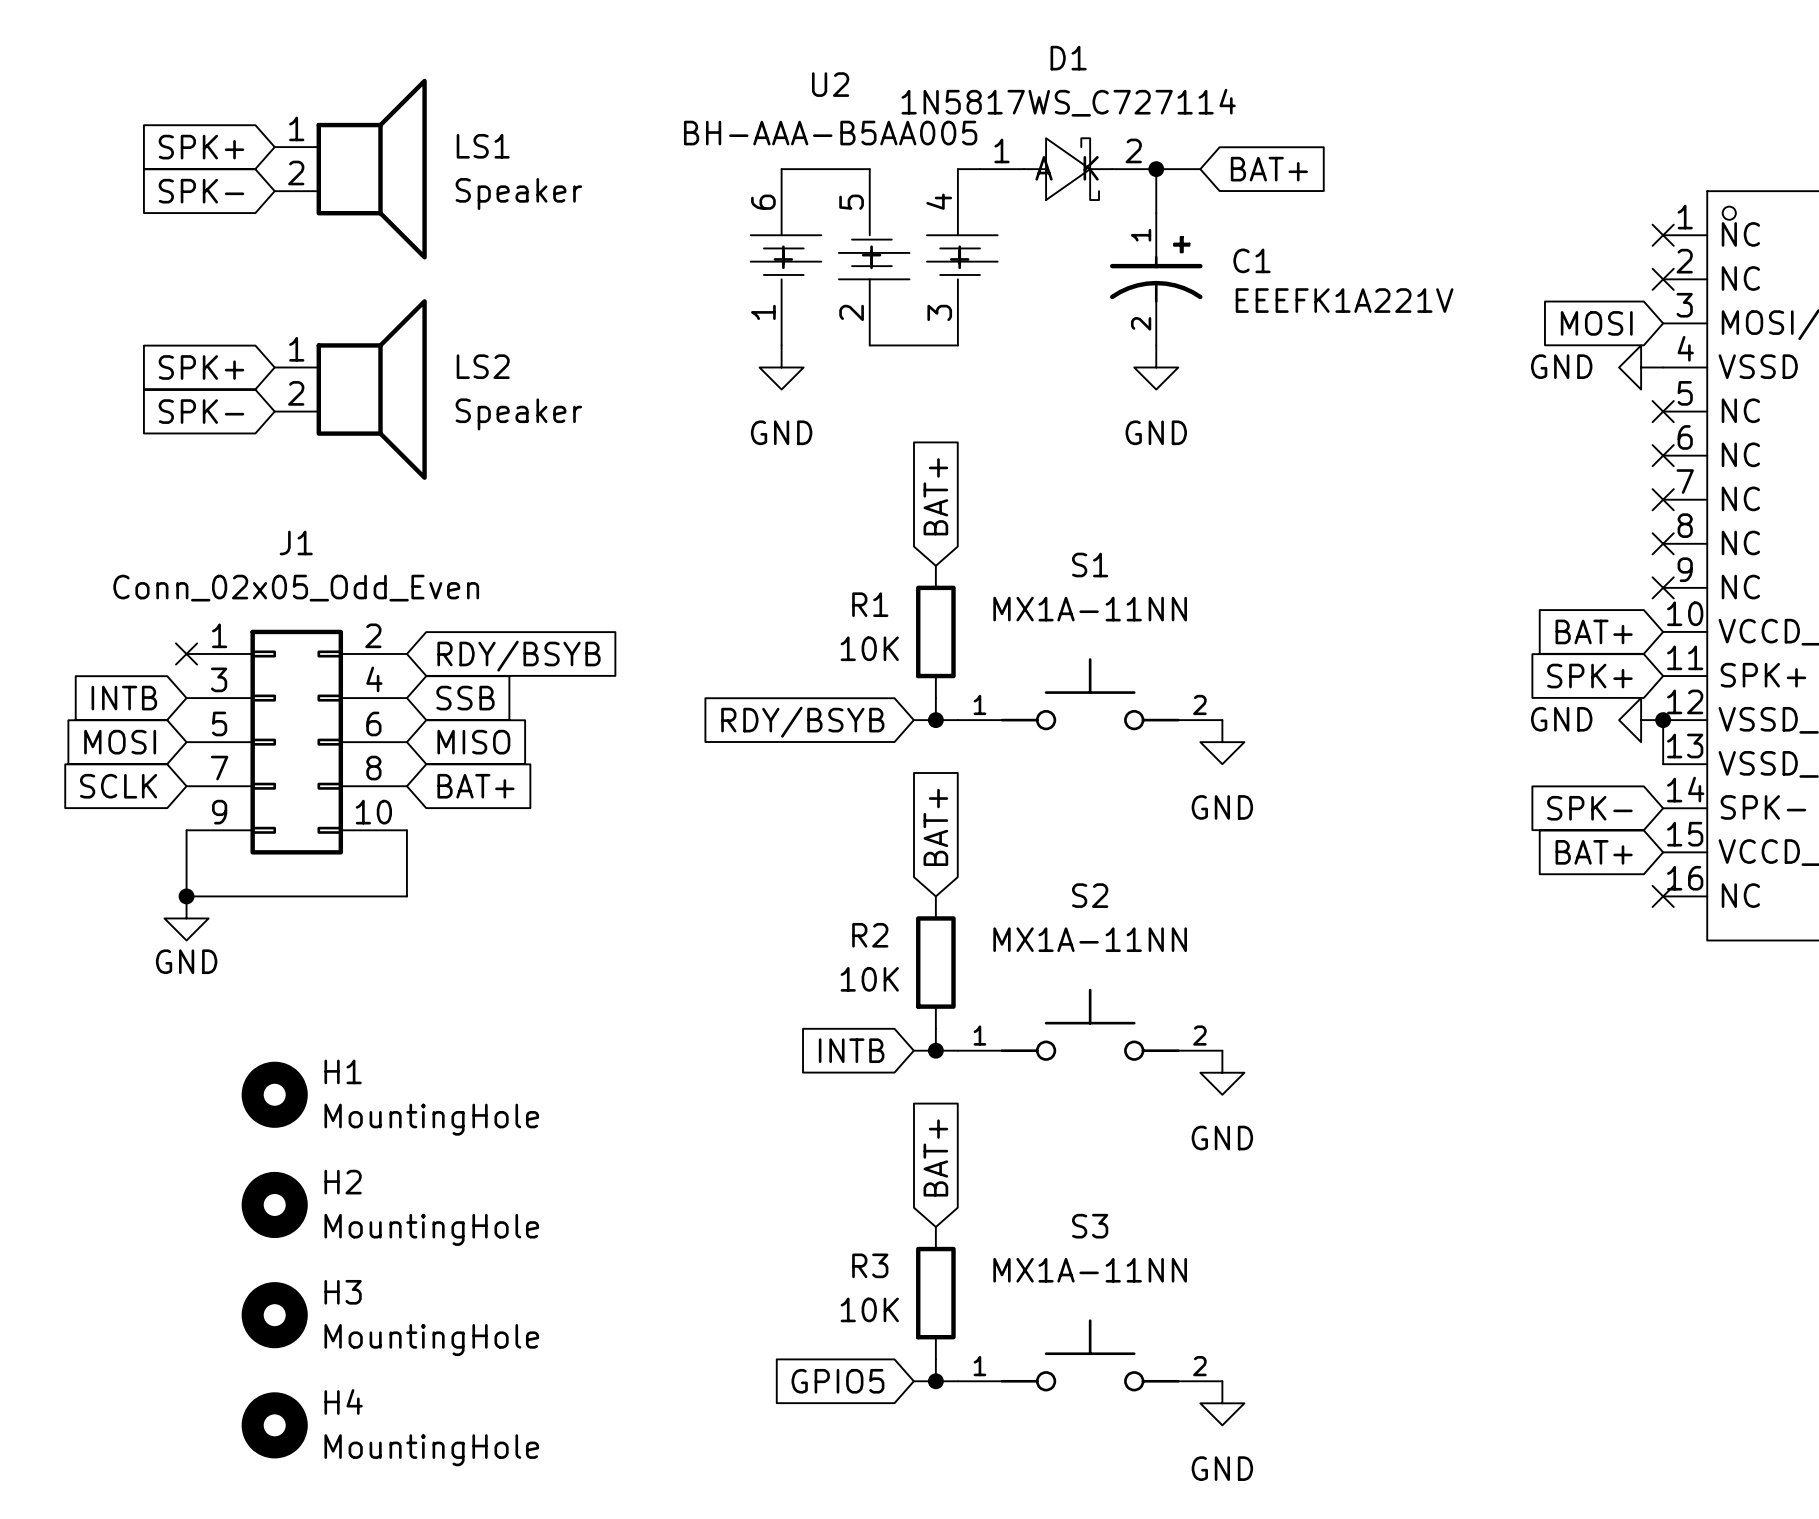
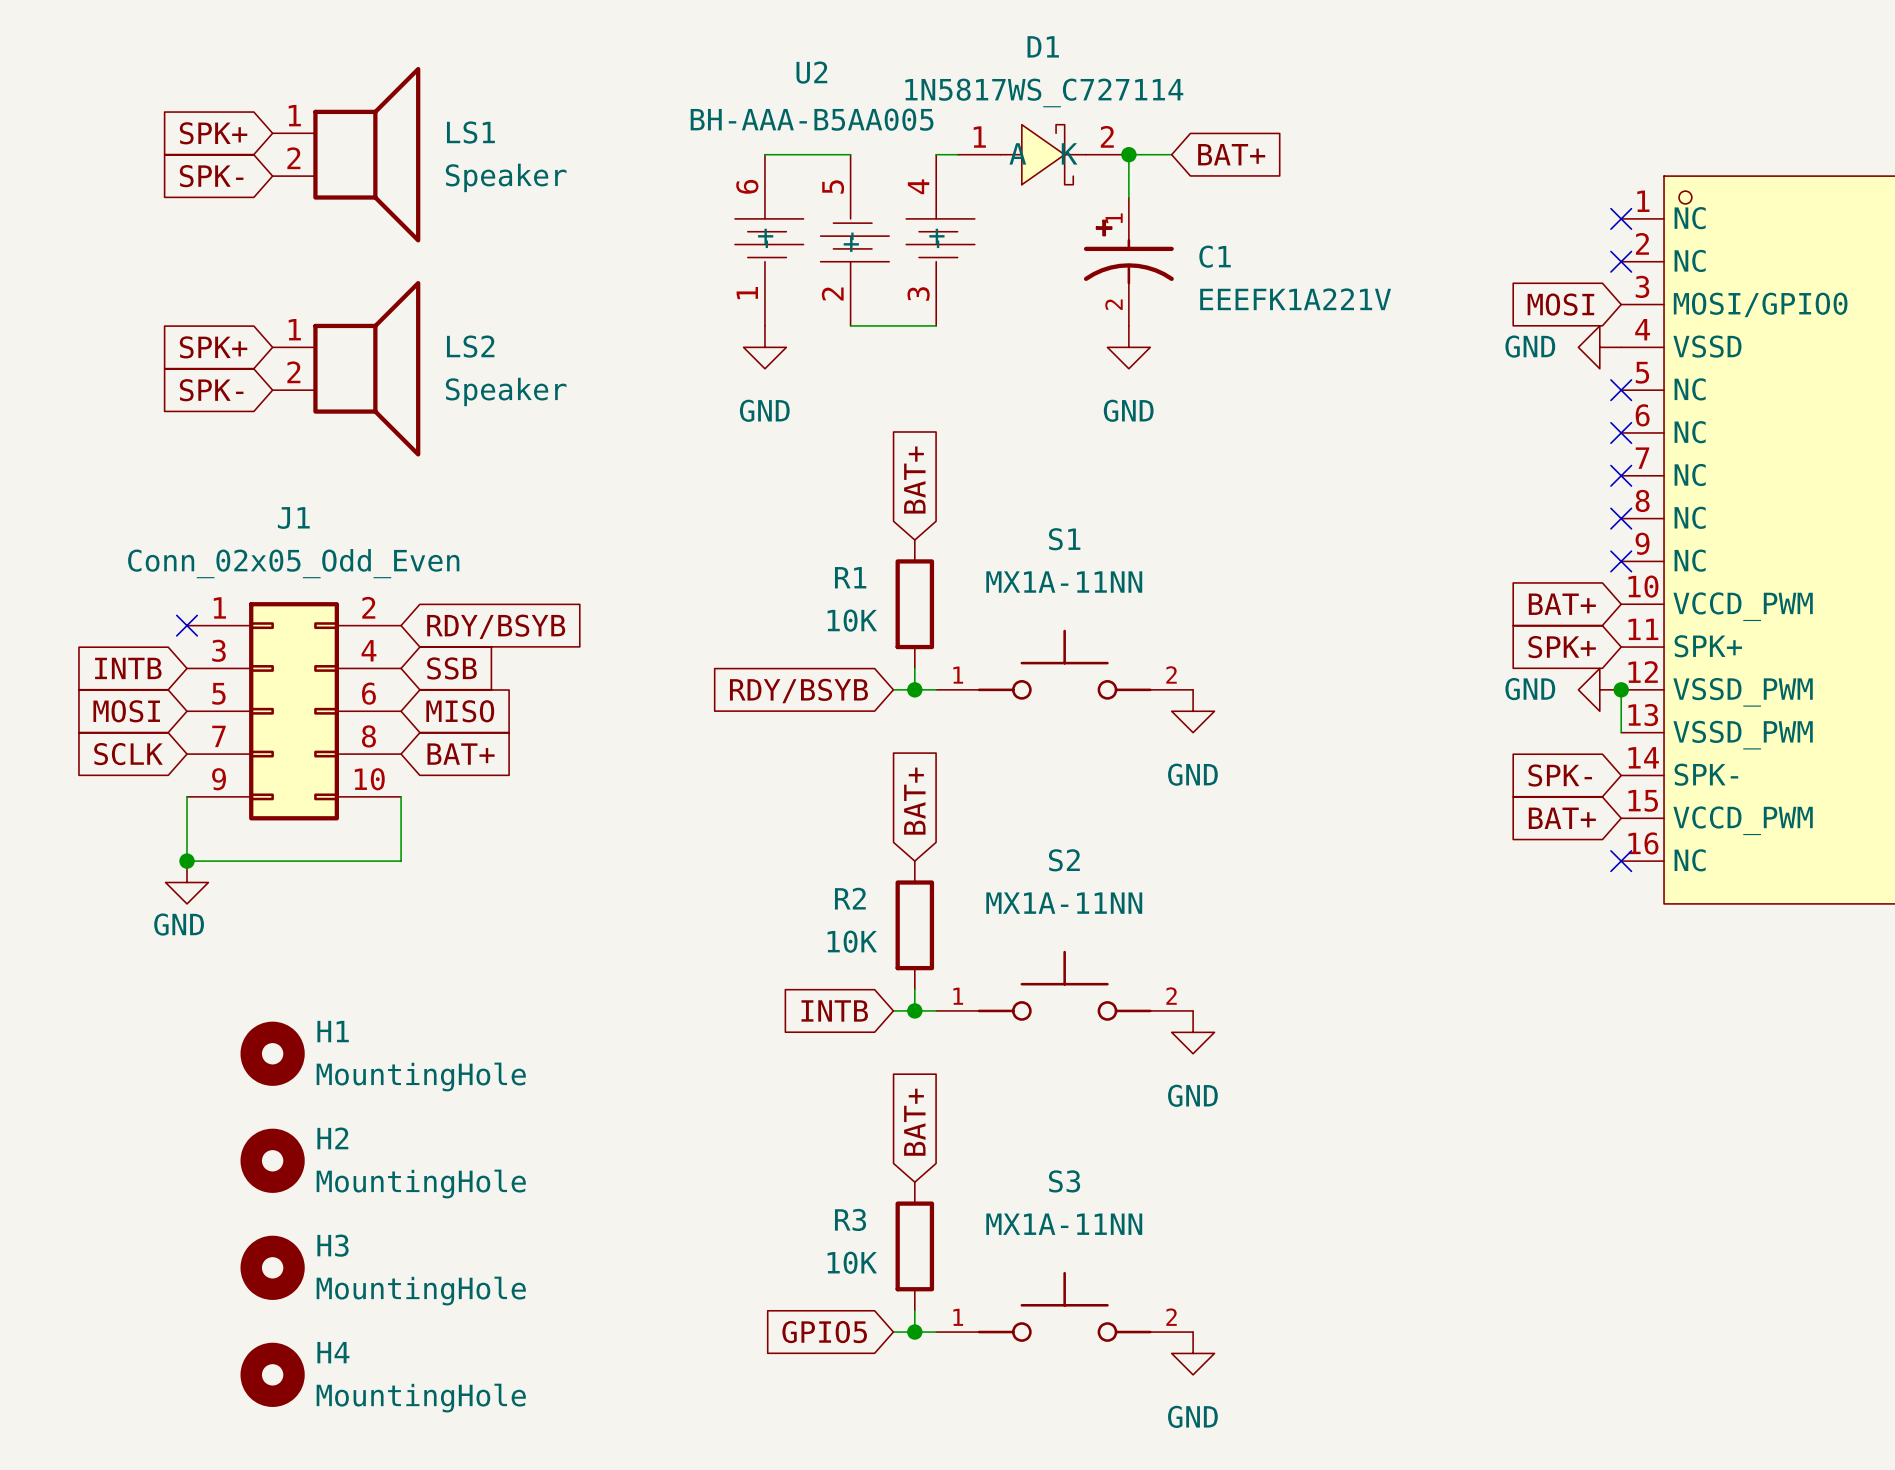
C1 flip: as is (1156, 269) -> left-right (1128, 252)

